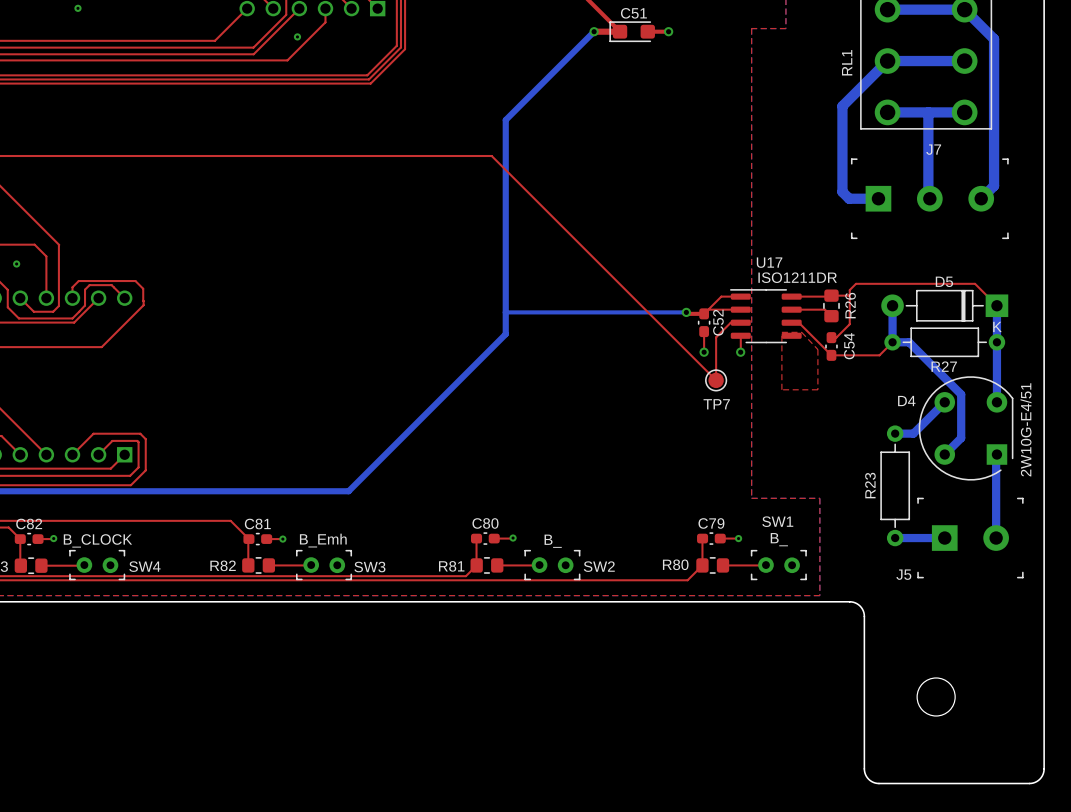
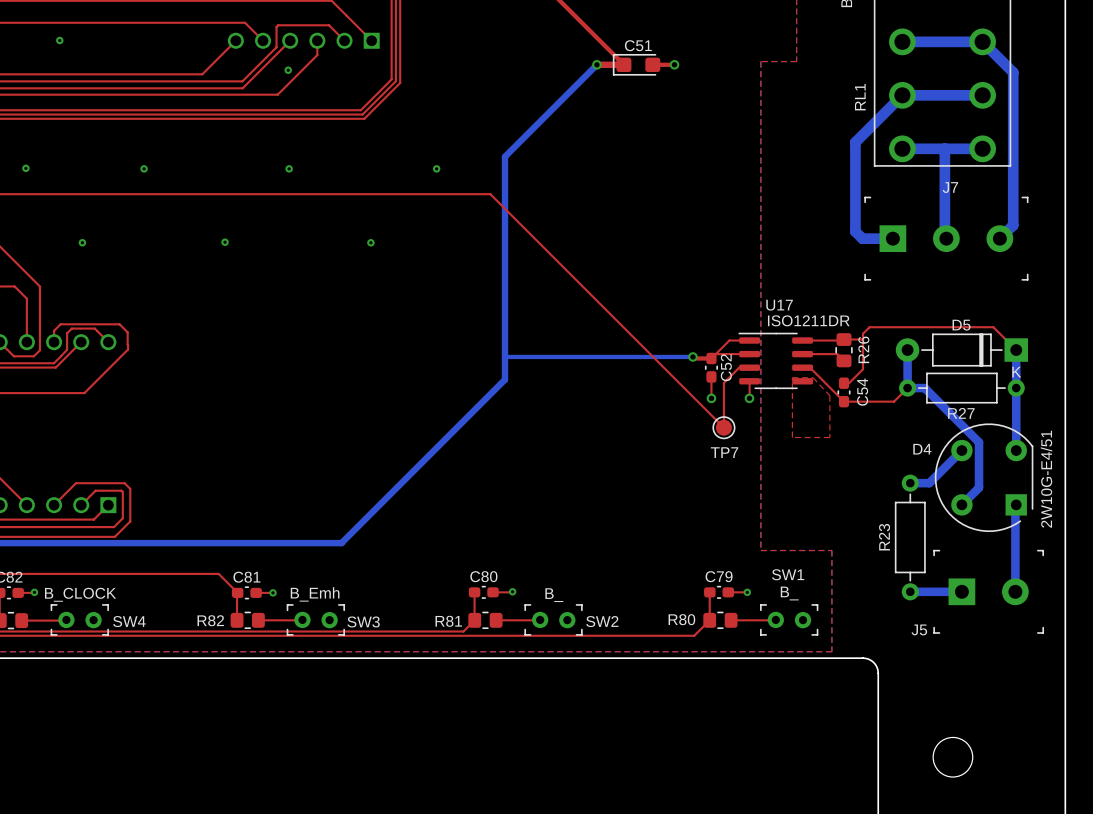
via: none -> (25, 168)
via: none -> (144, 168)
via: none -> (289, 168)
via: none -> (436, 168)
via: none -> (82, 242)
via: none -> (225, 242)
via: none -> (370, 242)

